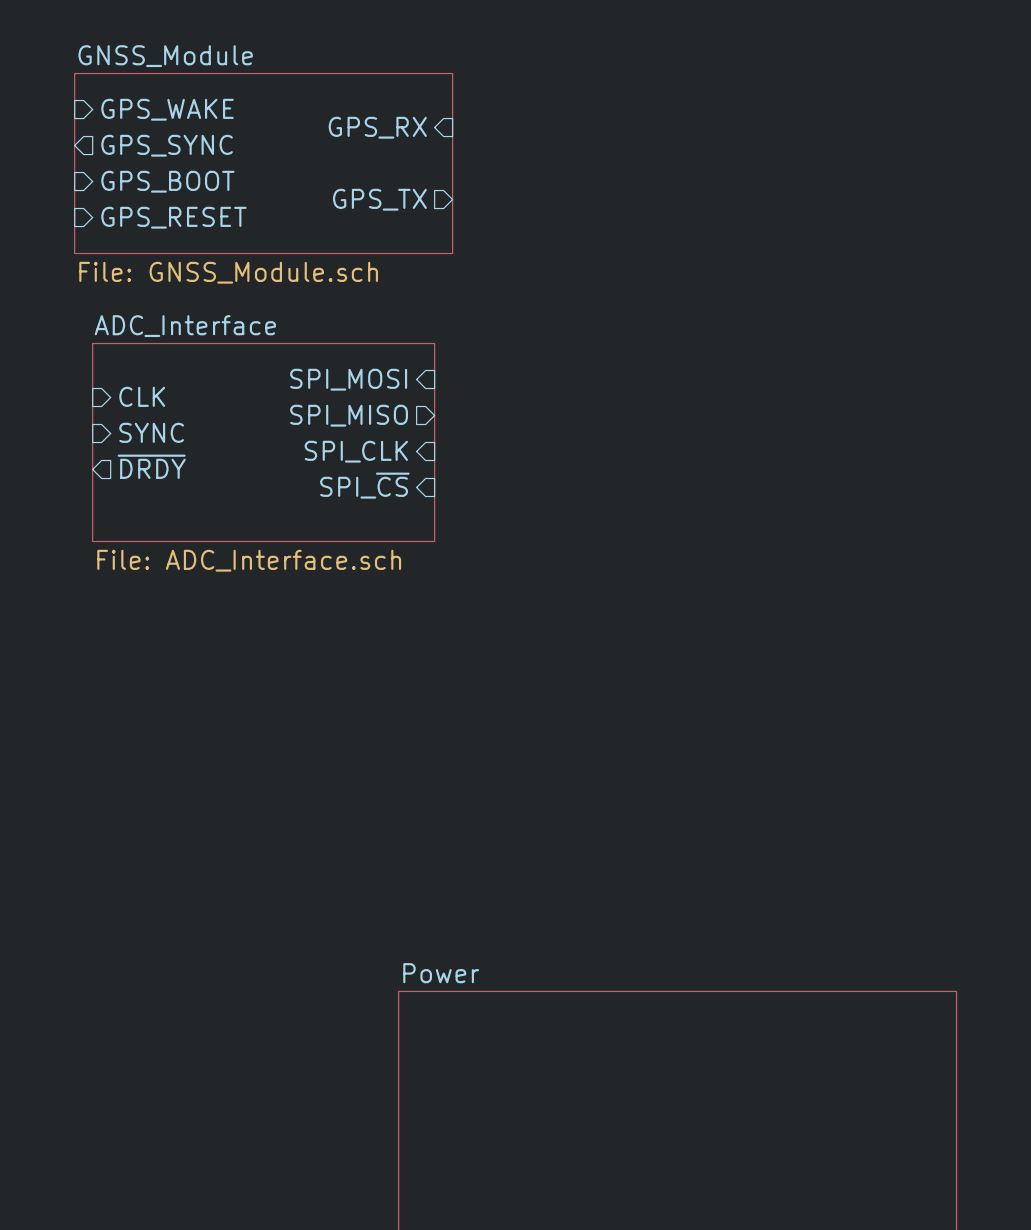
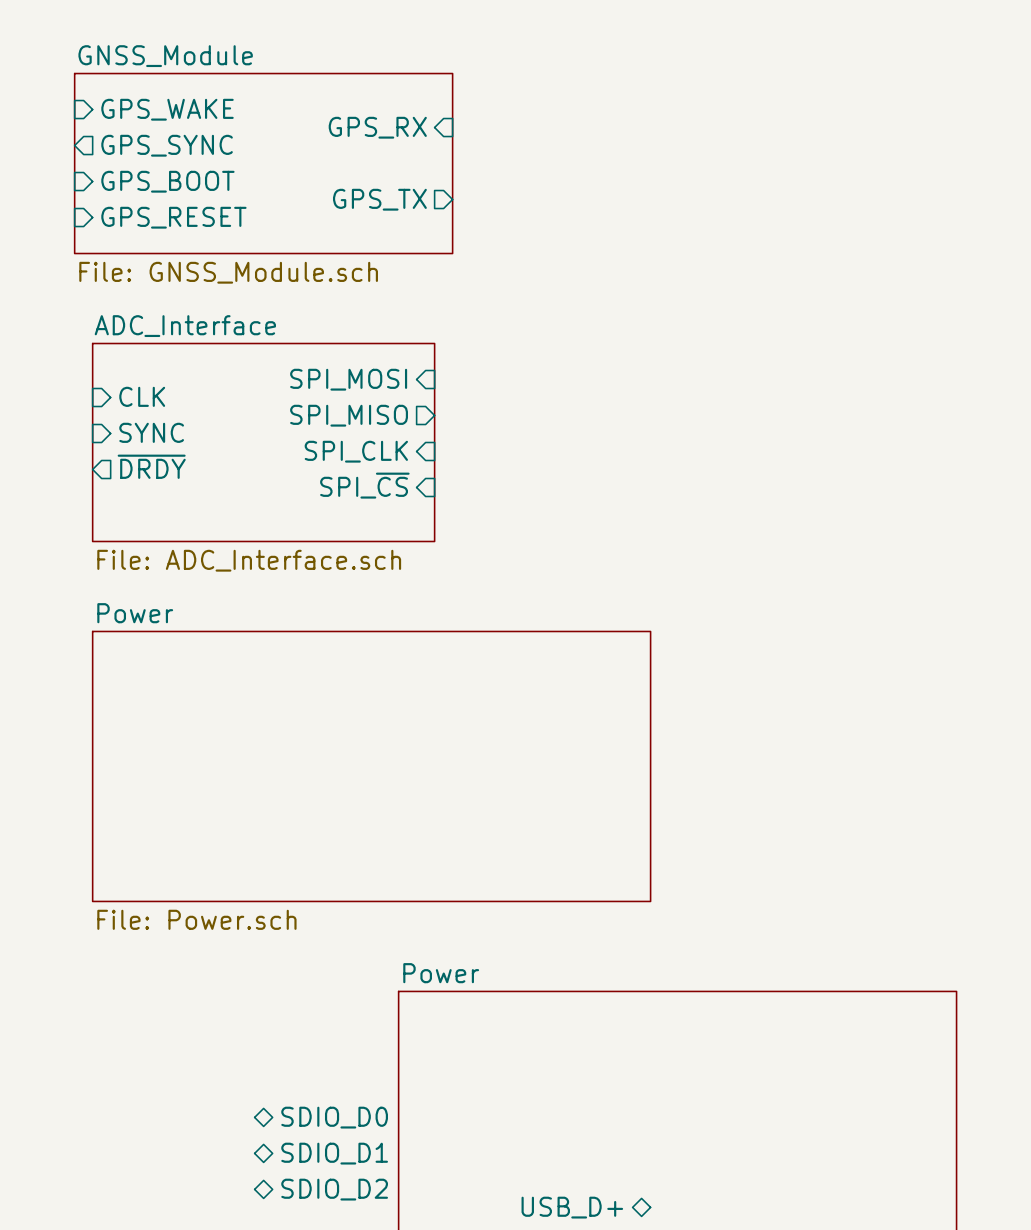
sheet Power: none -> File: Power.sch (371, 766)
sheet pin: none -> SDIO_D0 (334, 1117)
sheet pin: none -> SDIO_D1 (334, 1153)
sheet pin: none -> SDIO_D2 (334, 1189)
sheet pin: none -> USB_D+ (572, 1207)

